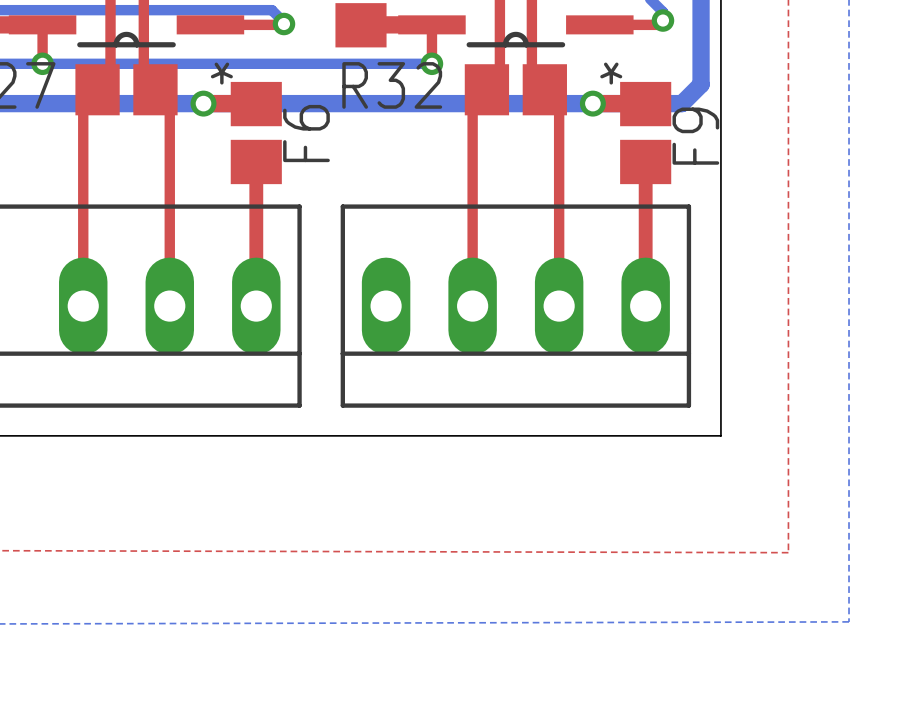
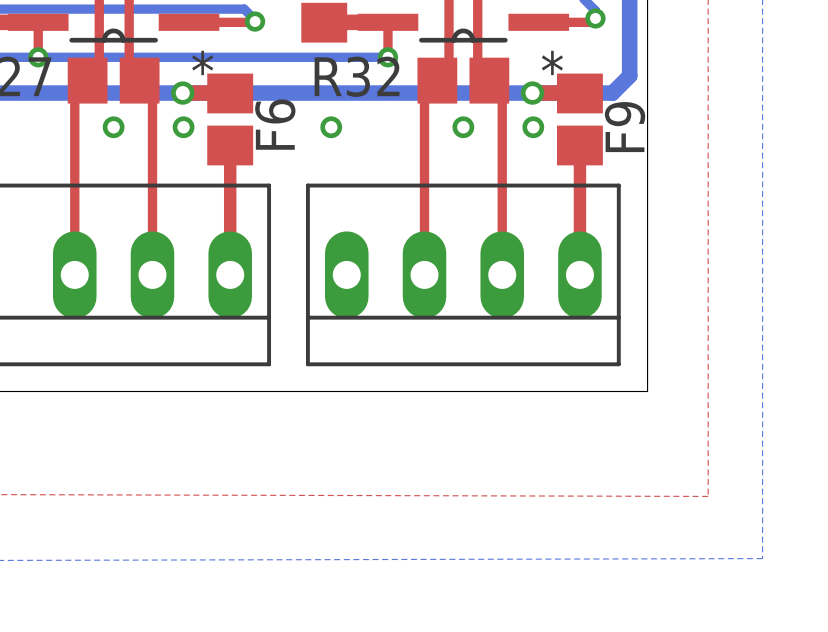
via: none -> (113, 127)
via: none -> (183, 127)
via: none -> (331, 127)
via: none -> (463, 127)
via: none -> (533, 127)

